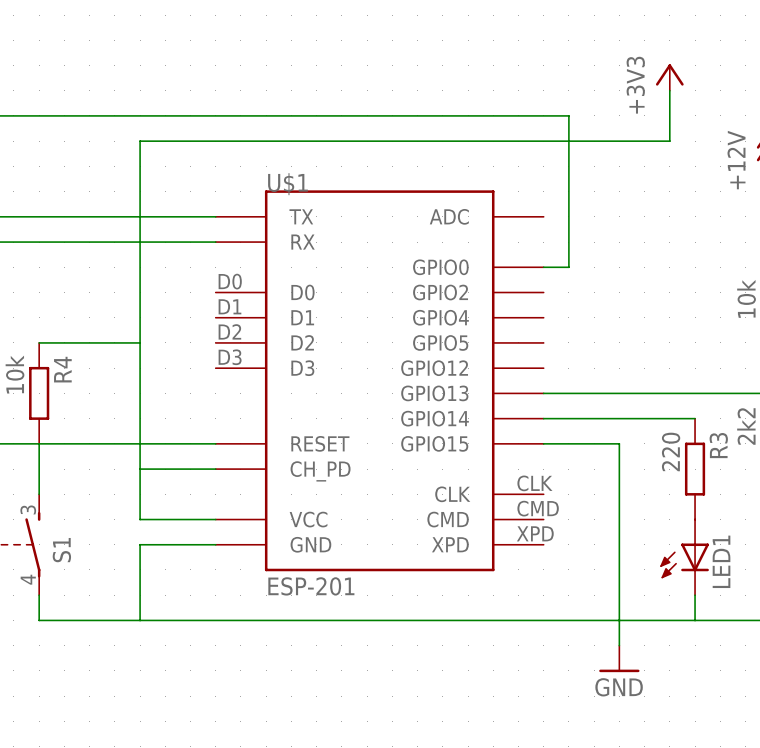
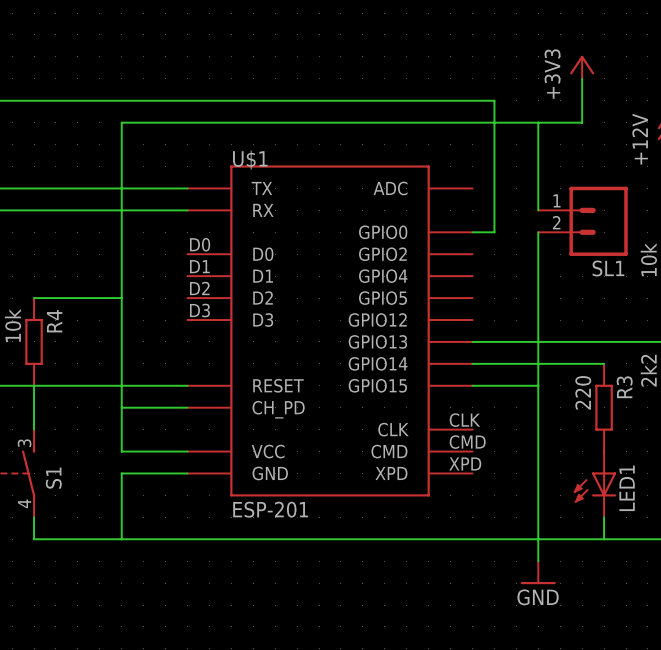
wire: none -> (538, 122) (538, 210)
SL1: none -> (583, 221)
wire: none -> (538, 232) (538, 385)

